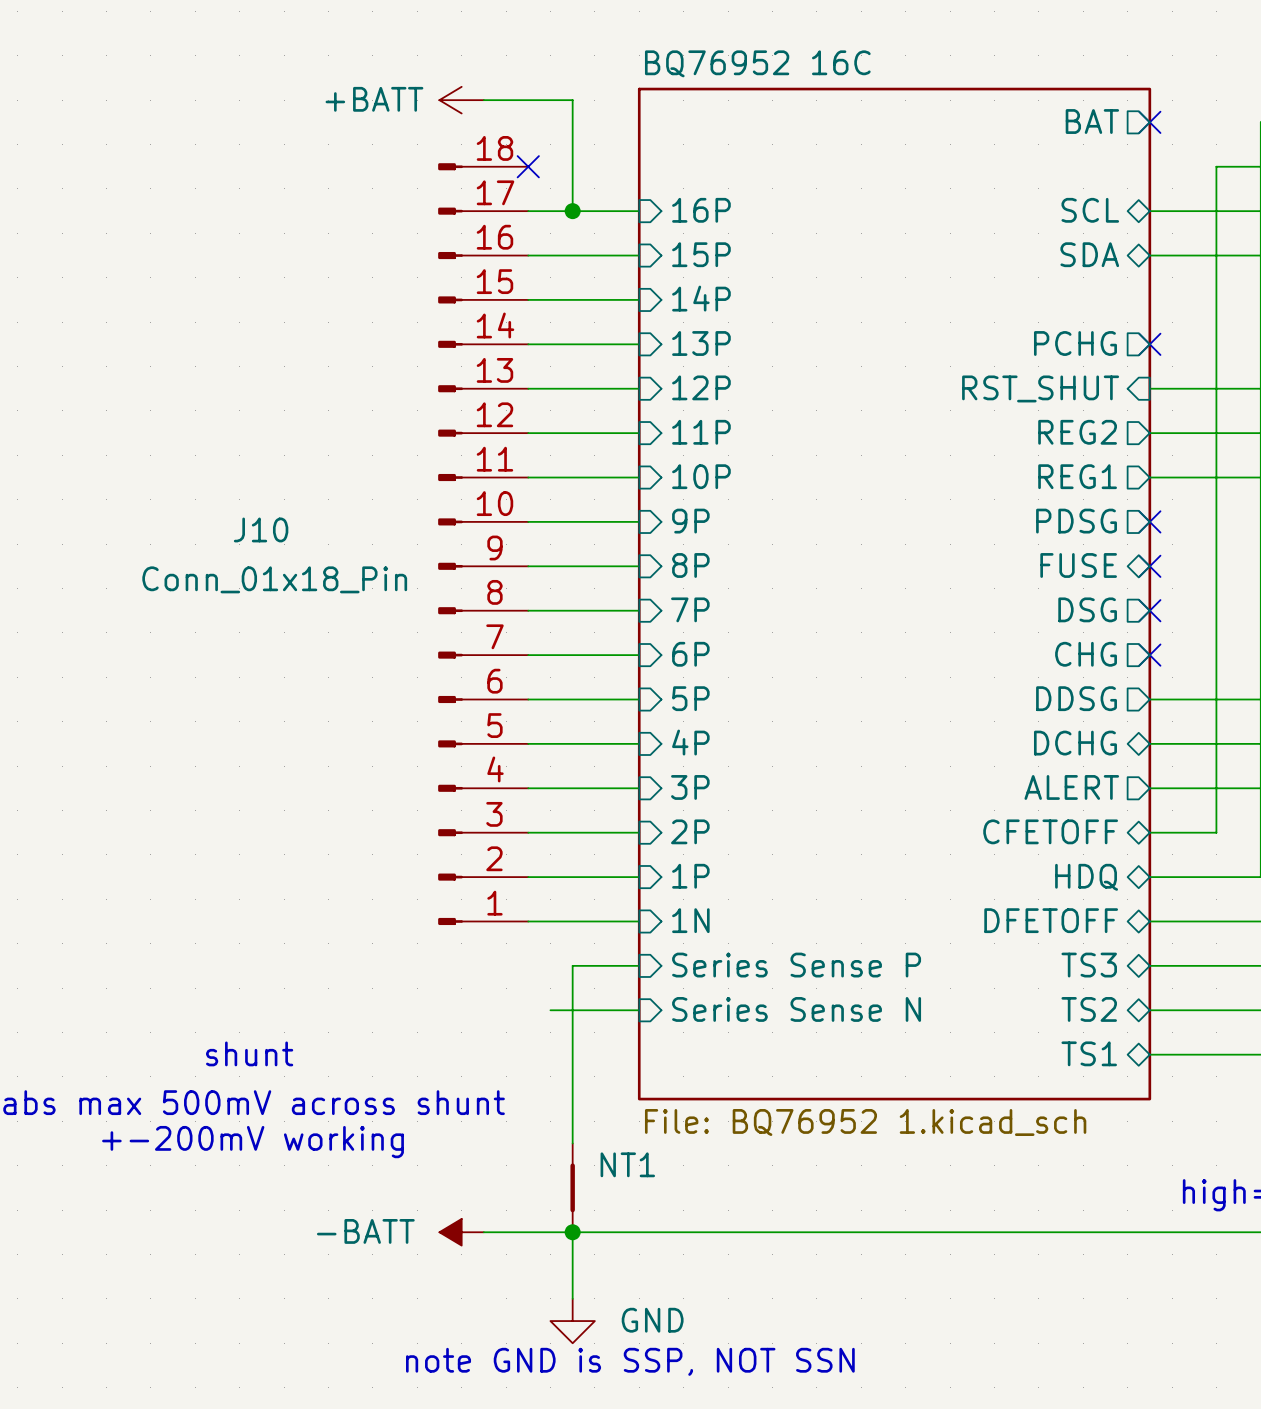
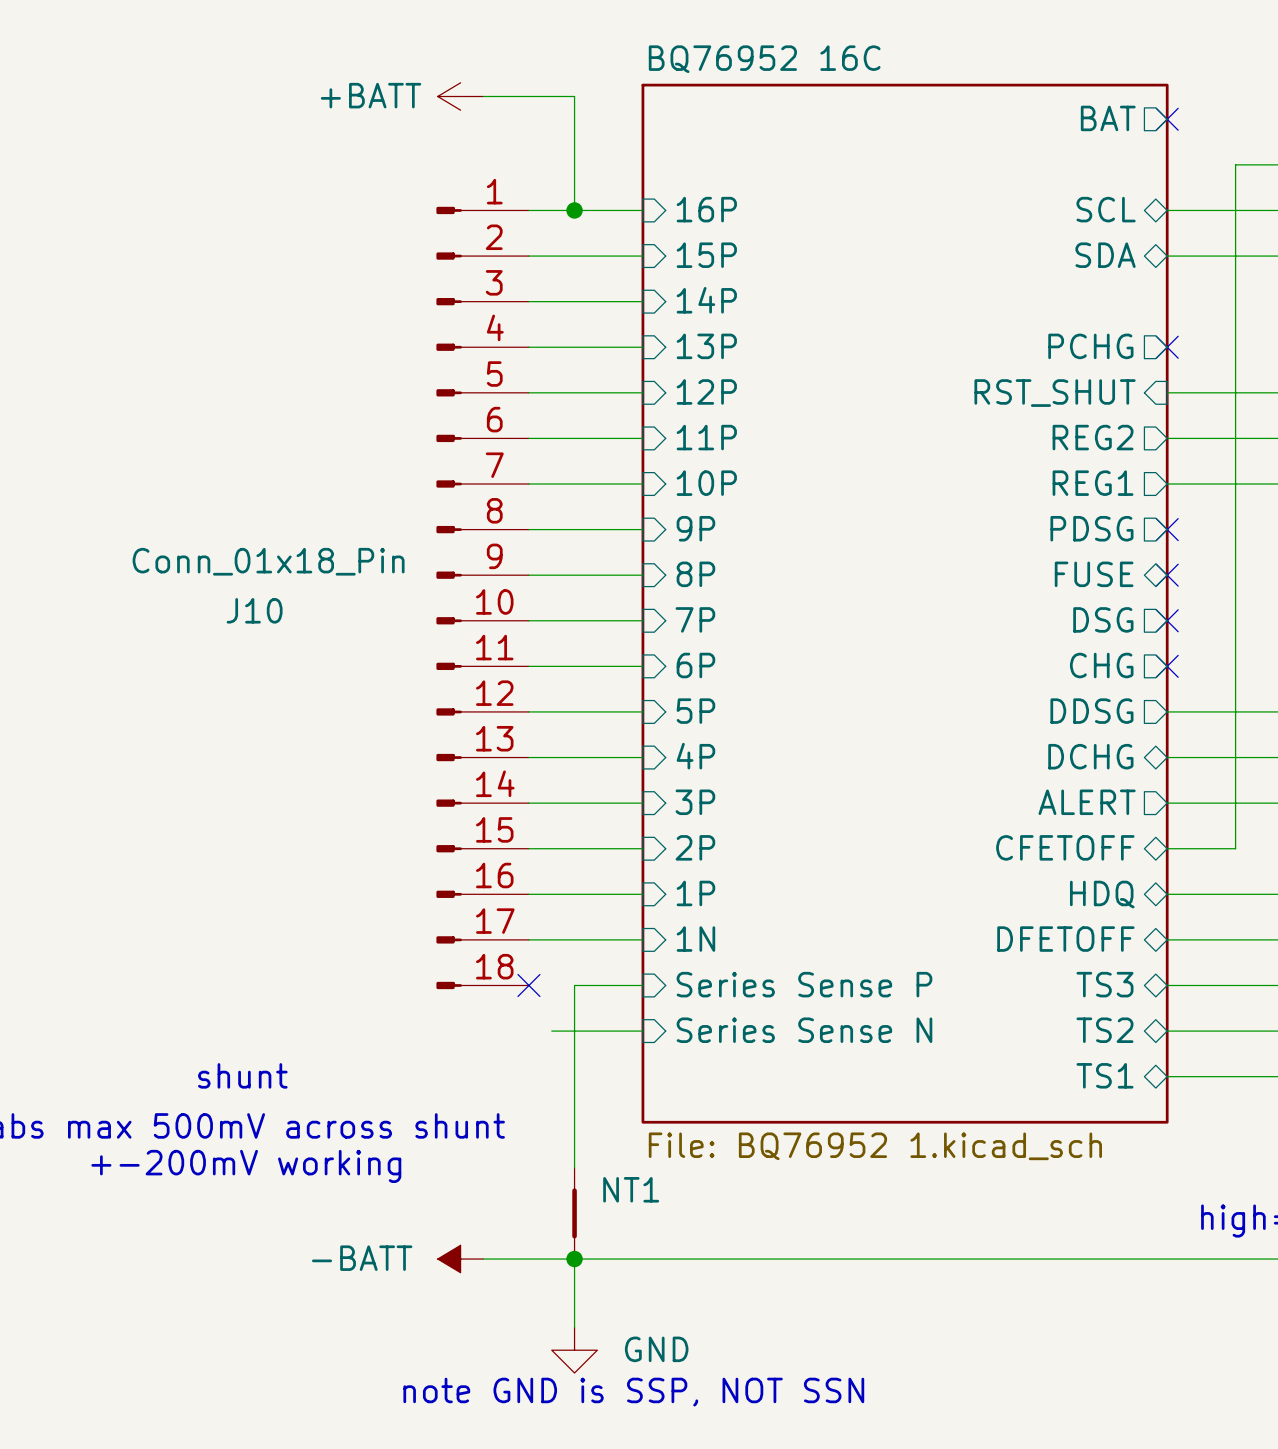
no-connect mark: (528, 166) -> none
J10 flip: as is (450, 544) -> up-down (449, 597)
no-connect mark: none -> (528, 985)

